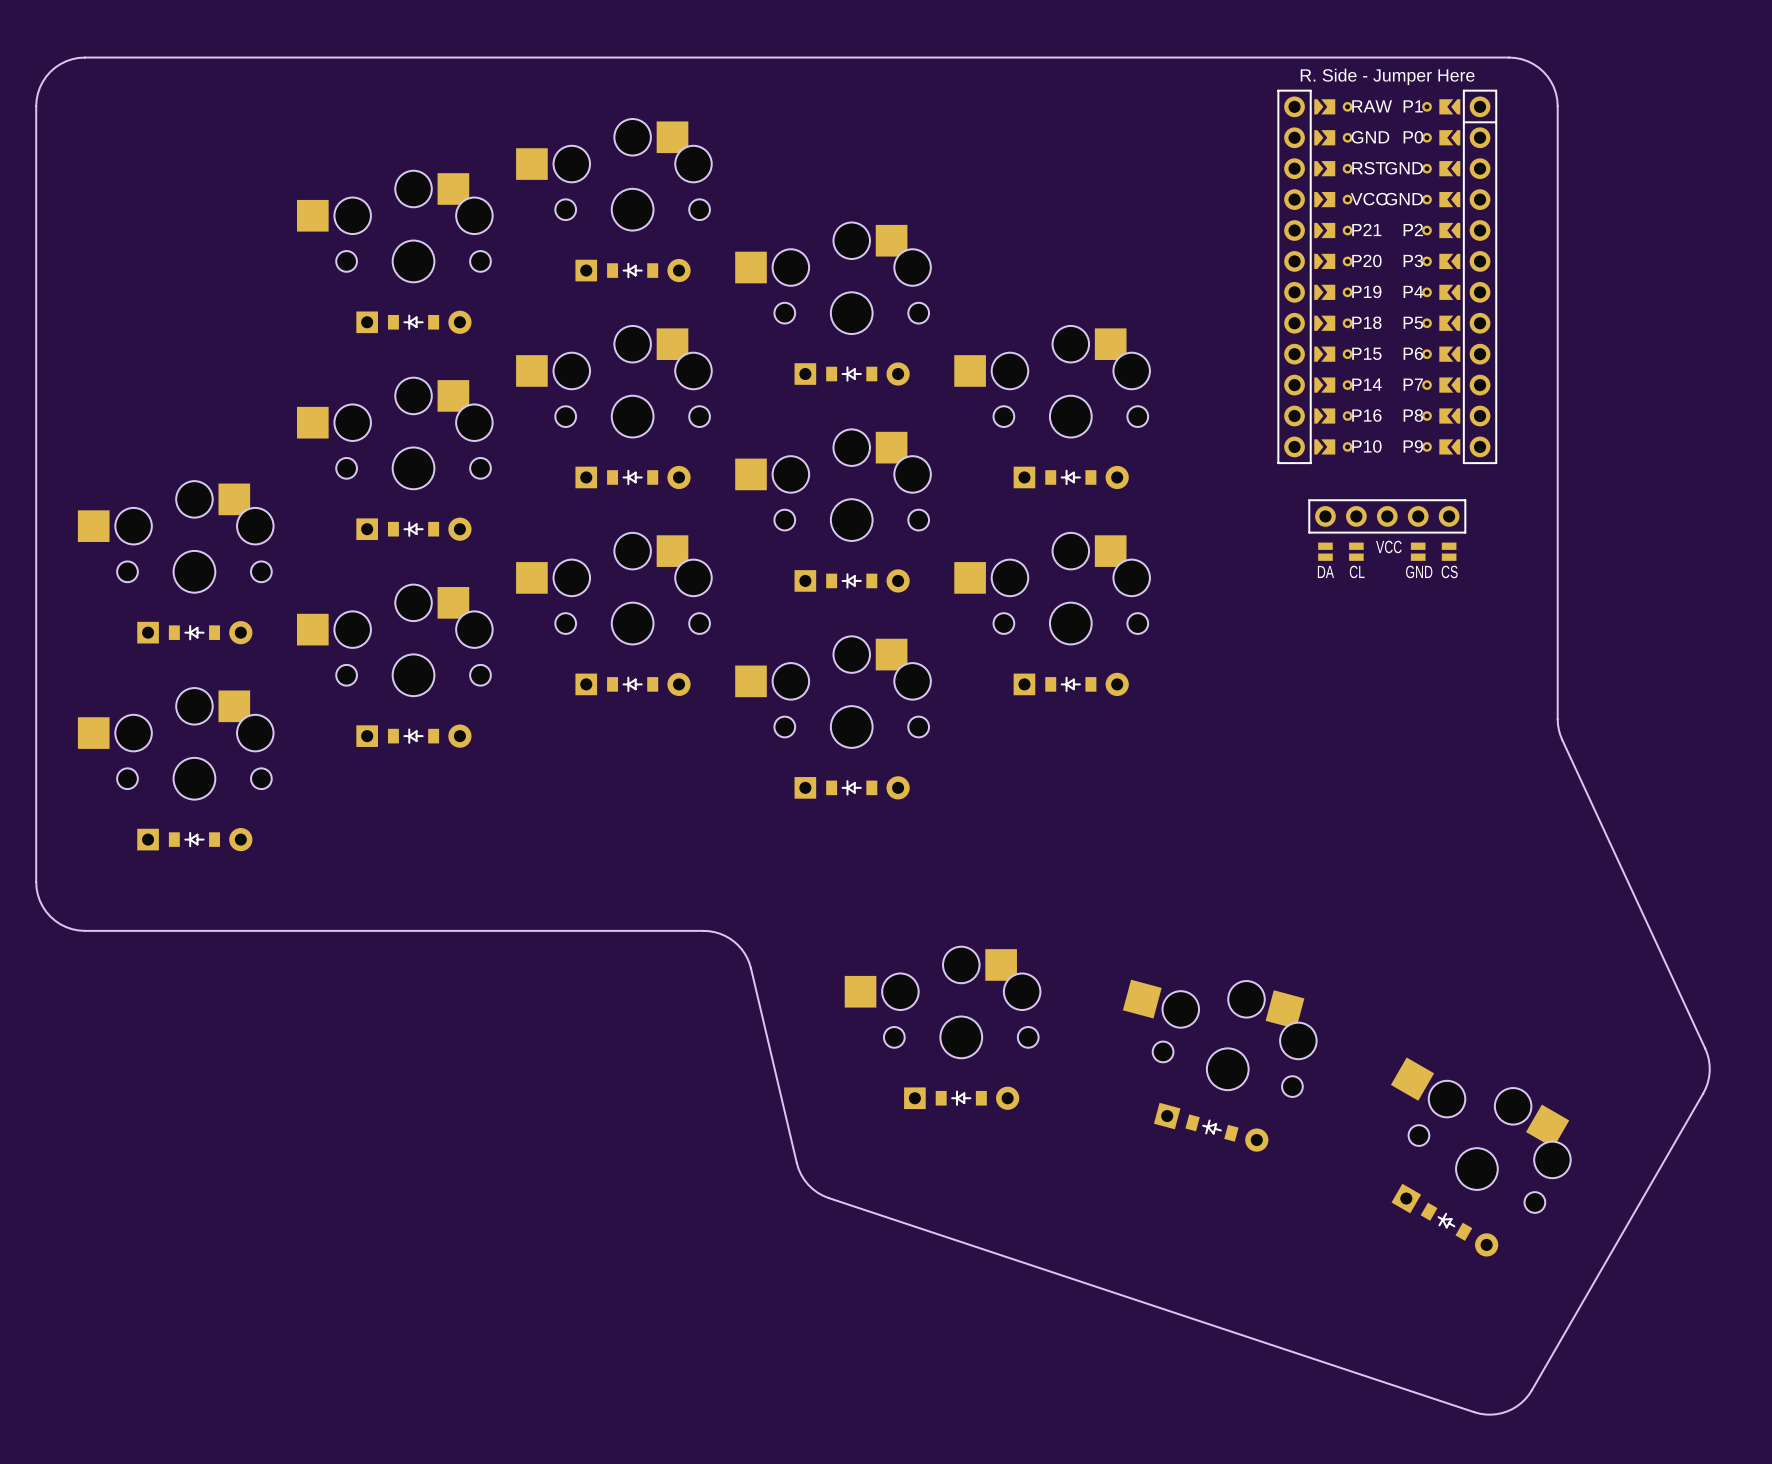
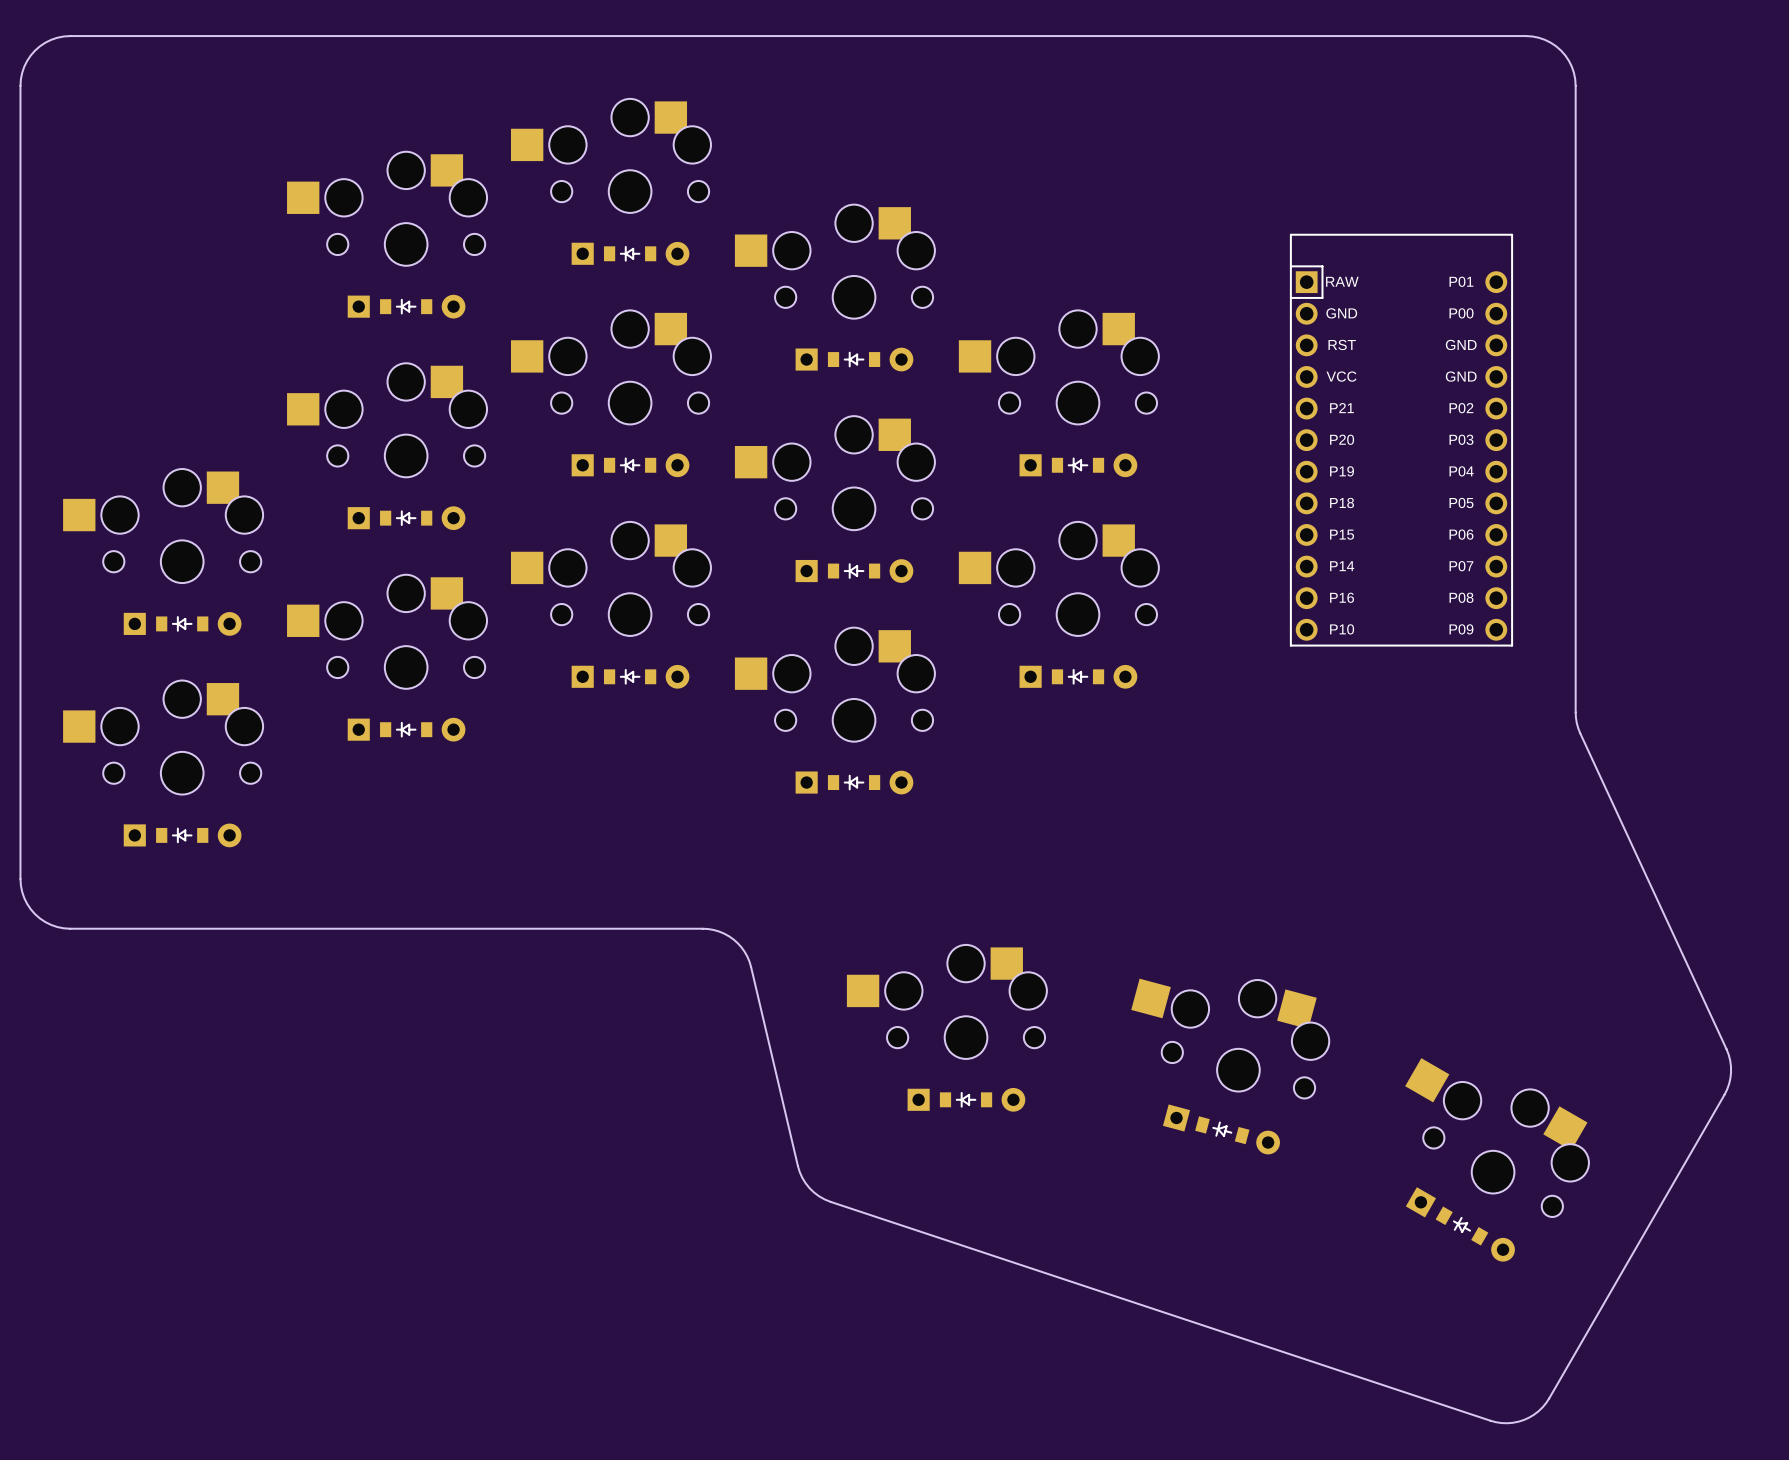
part: (1387, 276) -> none
part: none -> (1401, 440)
part: (1387, 530) -> none

